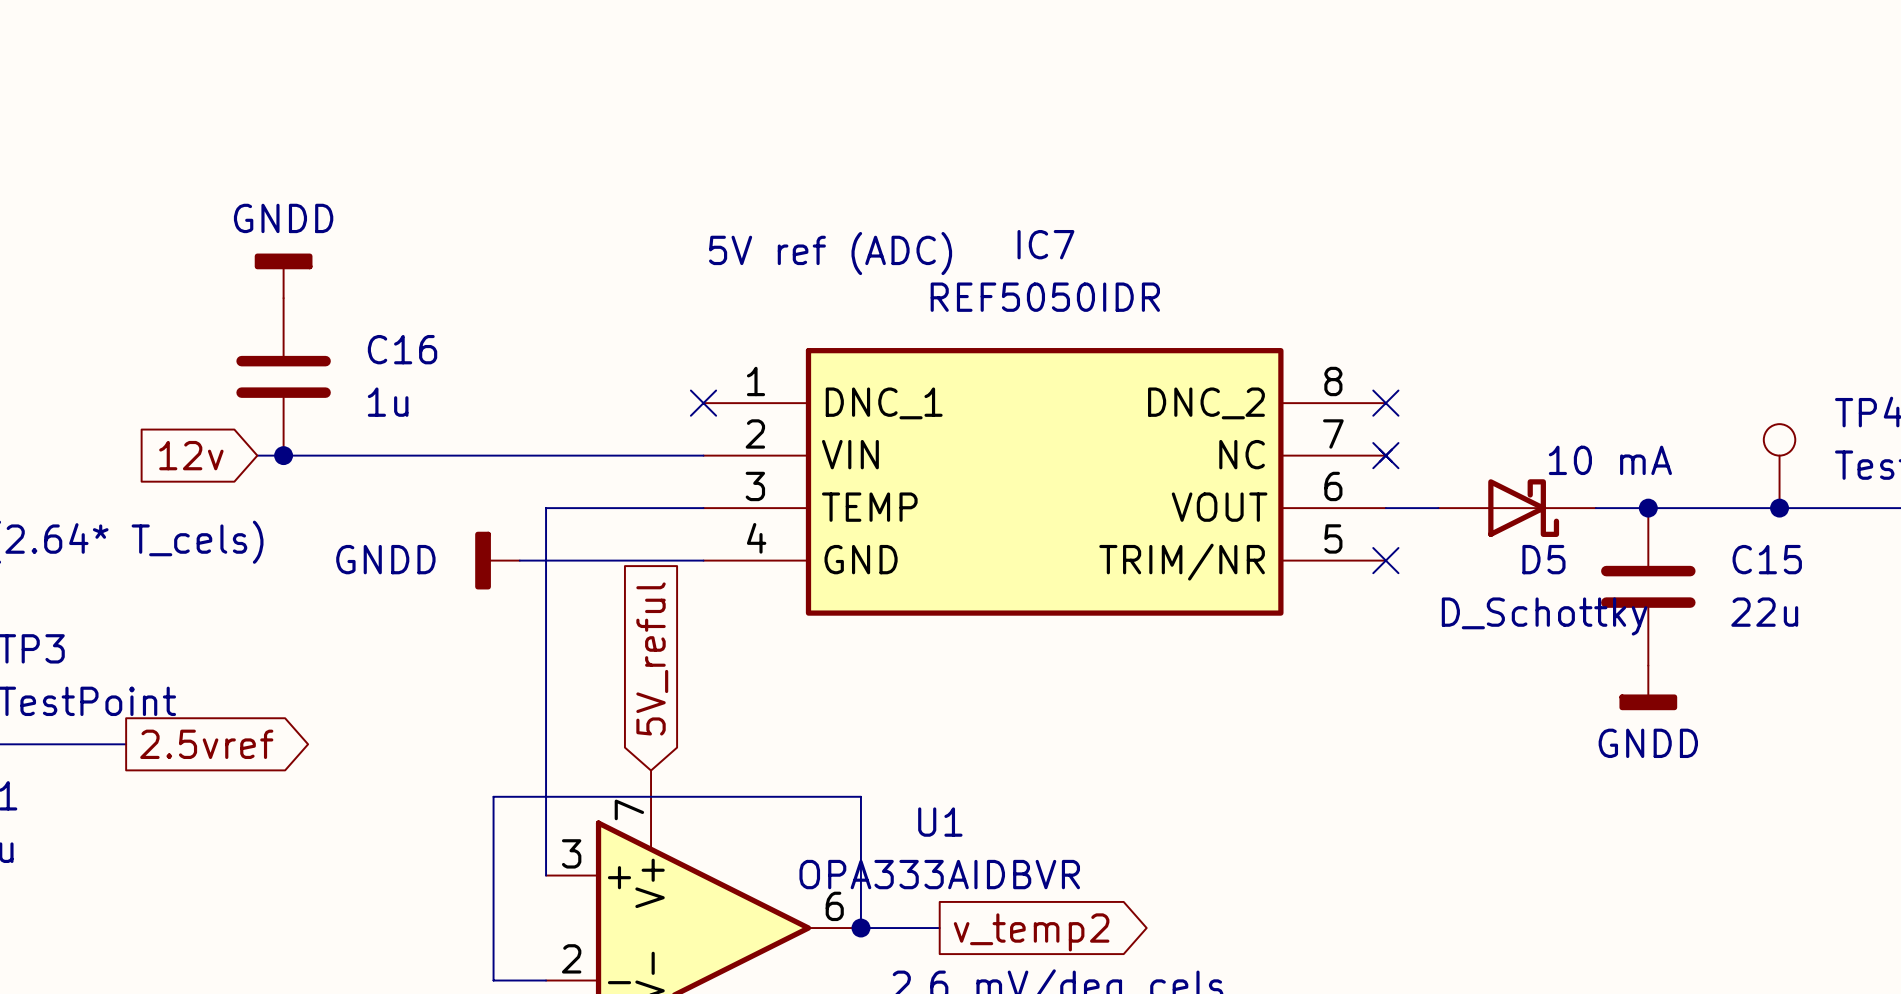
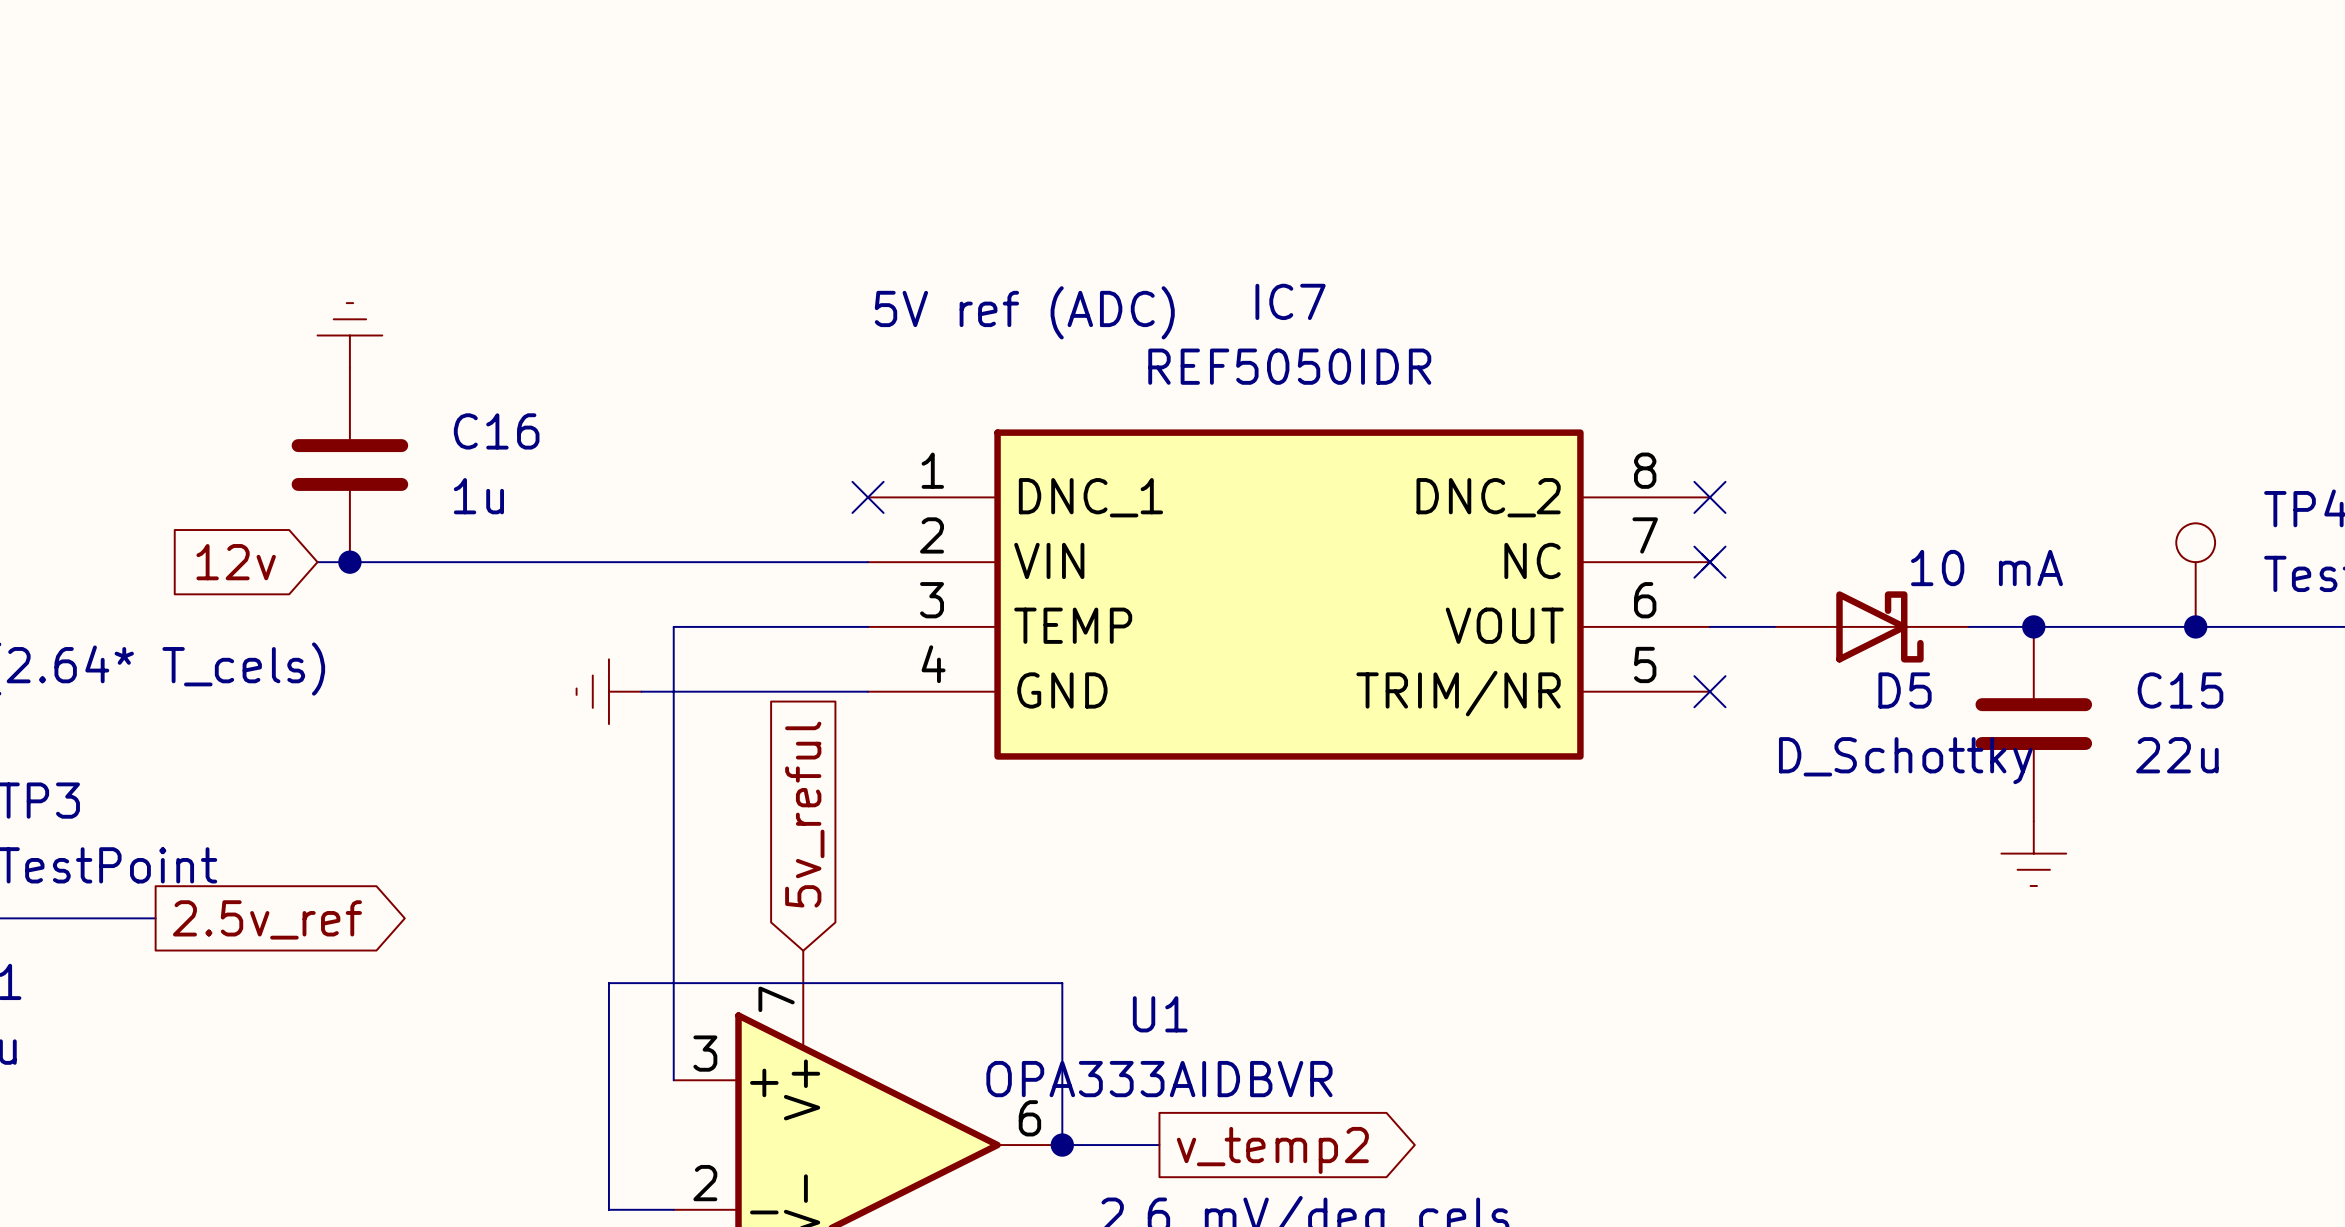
power symbol text: GNDD (283, 218) -> none
power symbol shape: [254, 253, 313, 299] -> [317, 303, 383, 368]
power symbol shape: [475, 531, 520, 590] -> [576, 659, 642, 725]
power symbol text: GNDD (385, 559) -> none
global label: 5V_reful (652, 658) -> 5v_reful (804, 814)
power symbol shape: [1619, 665, 1678, 711] -> [2001, 821, 2067, 886]
power symbol text: GNDD (1648, 743) -> none
global label: 2.5vref (206, 744) -> 2.5v_ref (267, 919)

